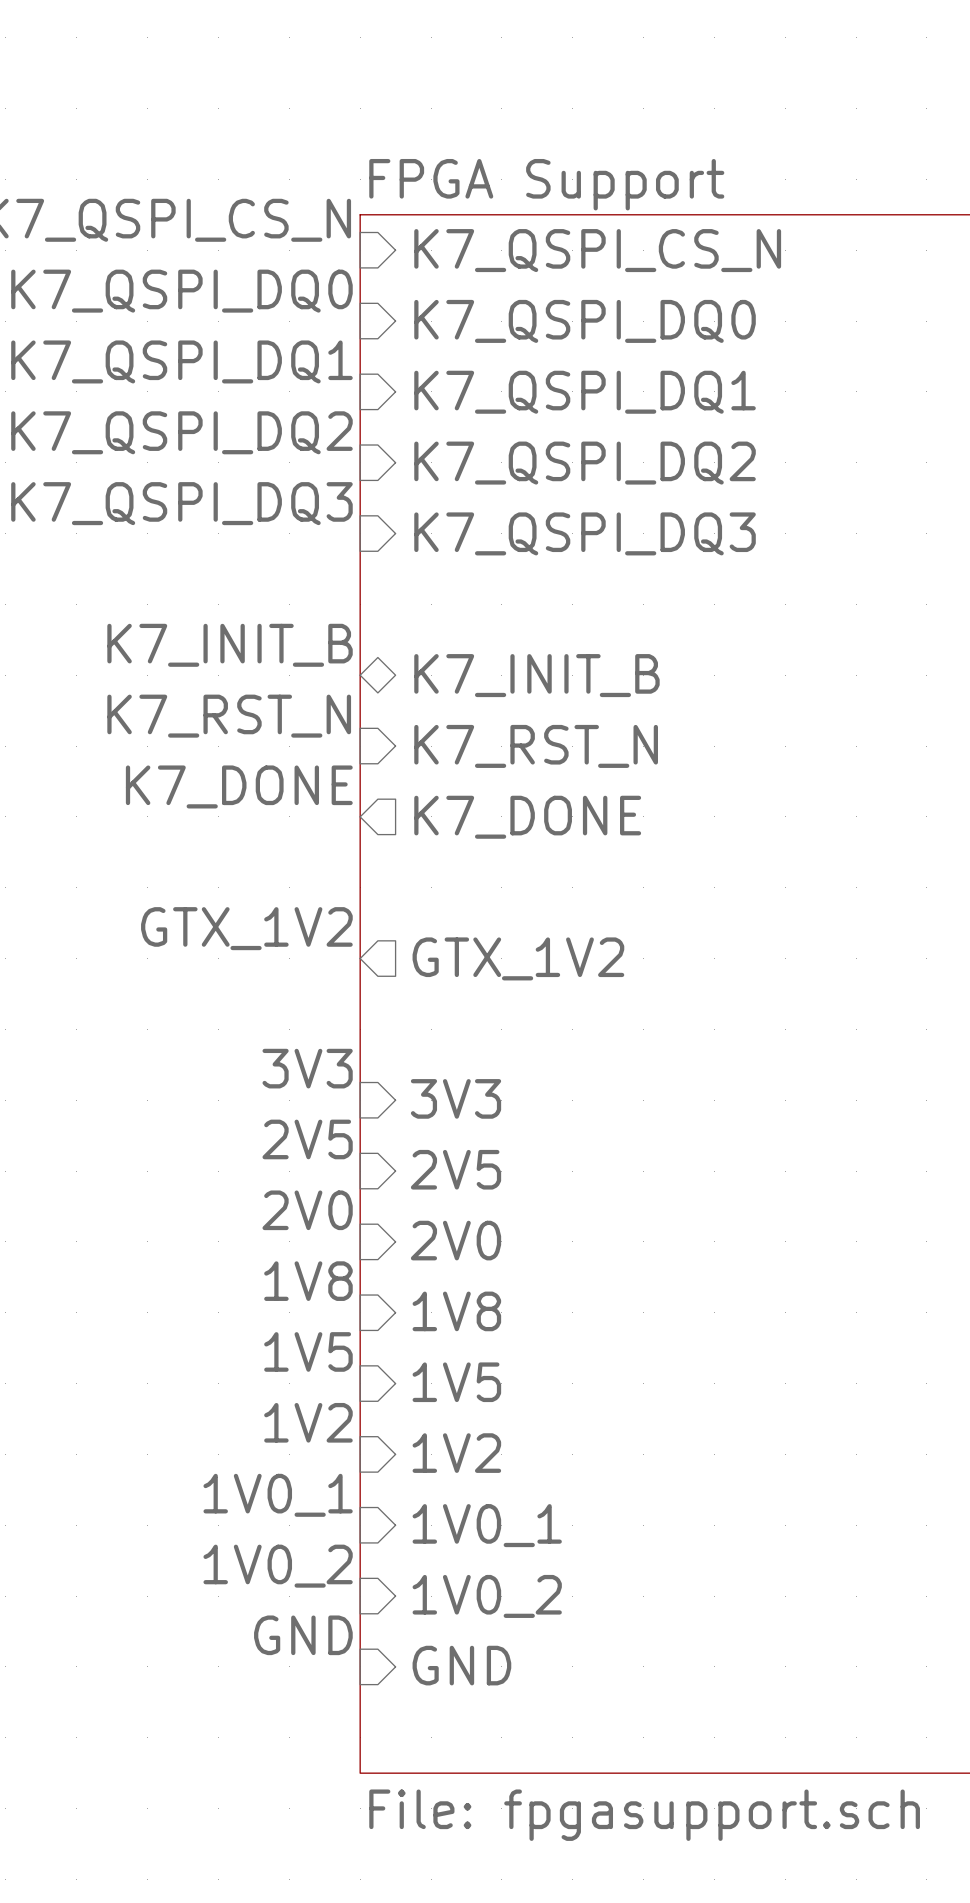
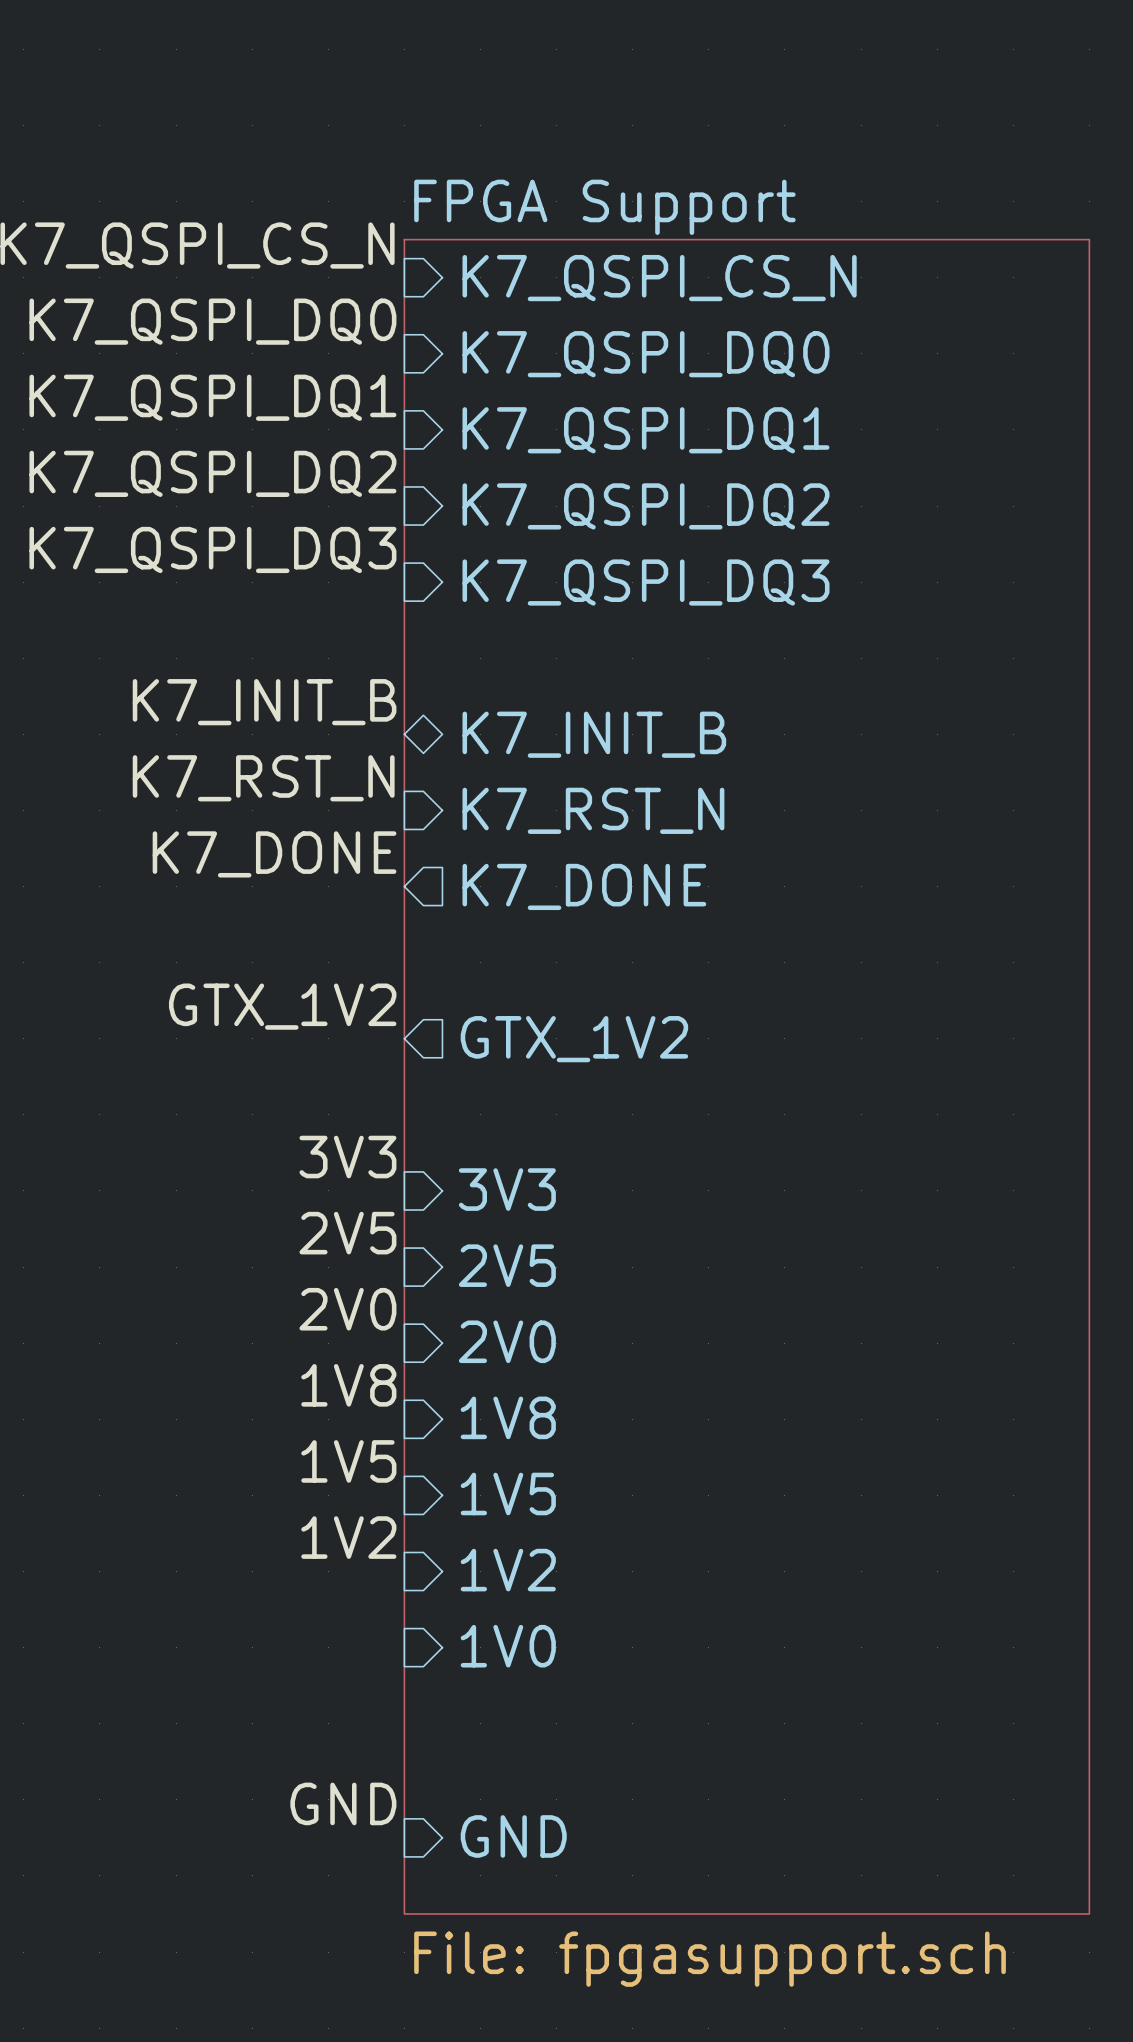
label: 1V0_1 (278, 1495) -> none
sheet pin: 1V0_1 (487, 1525) -> 1V0 (508, 1646)
label: 1V0_2 (278, 1566) -> none
sheet pin: 1V0_2 (487, 1596) -> none
label position: GND (303, 1635) -> GND (343, 1803)
sheet pin position: GND (461, 1665) -> GND (513, 1836)

